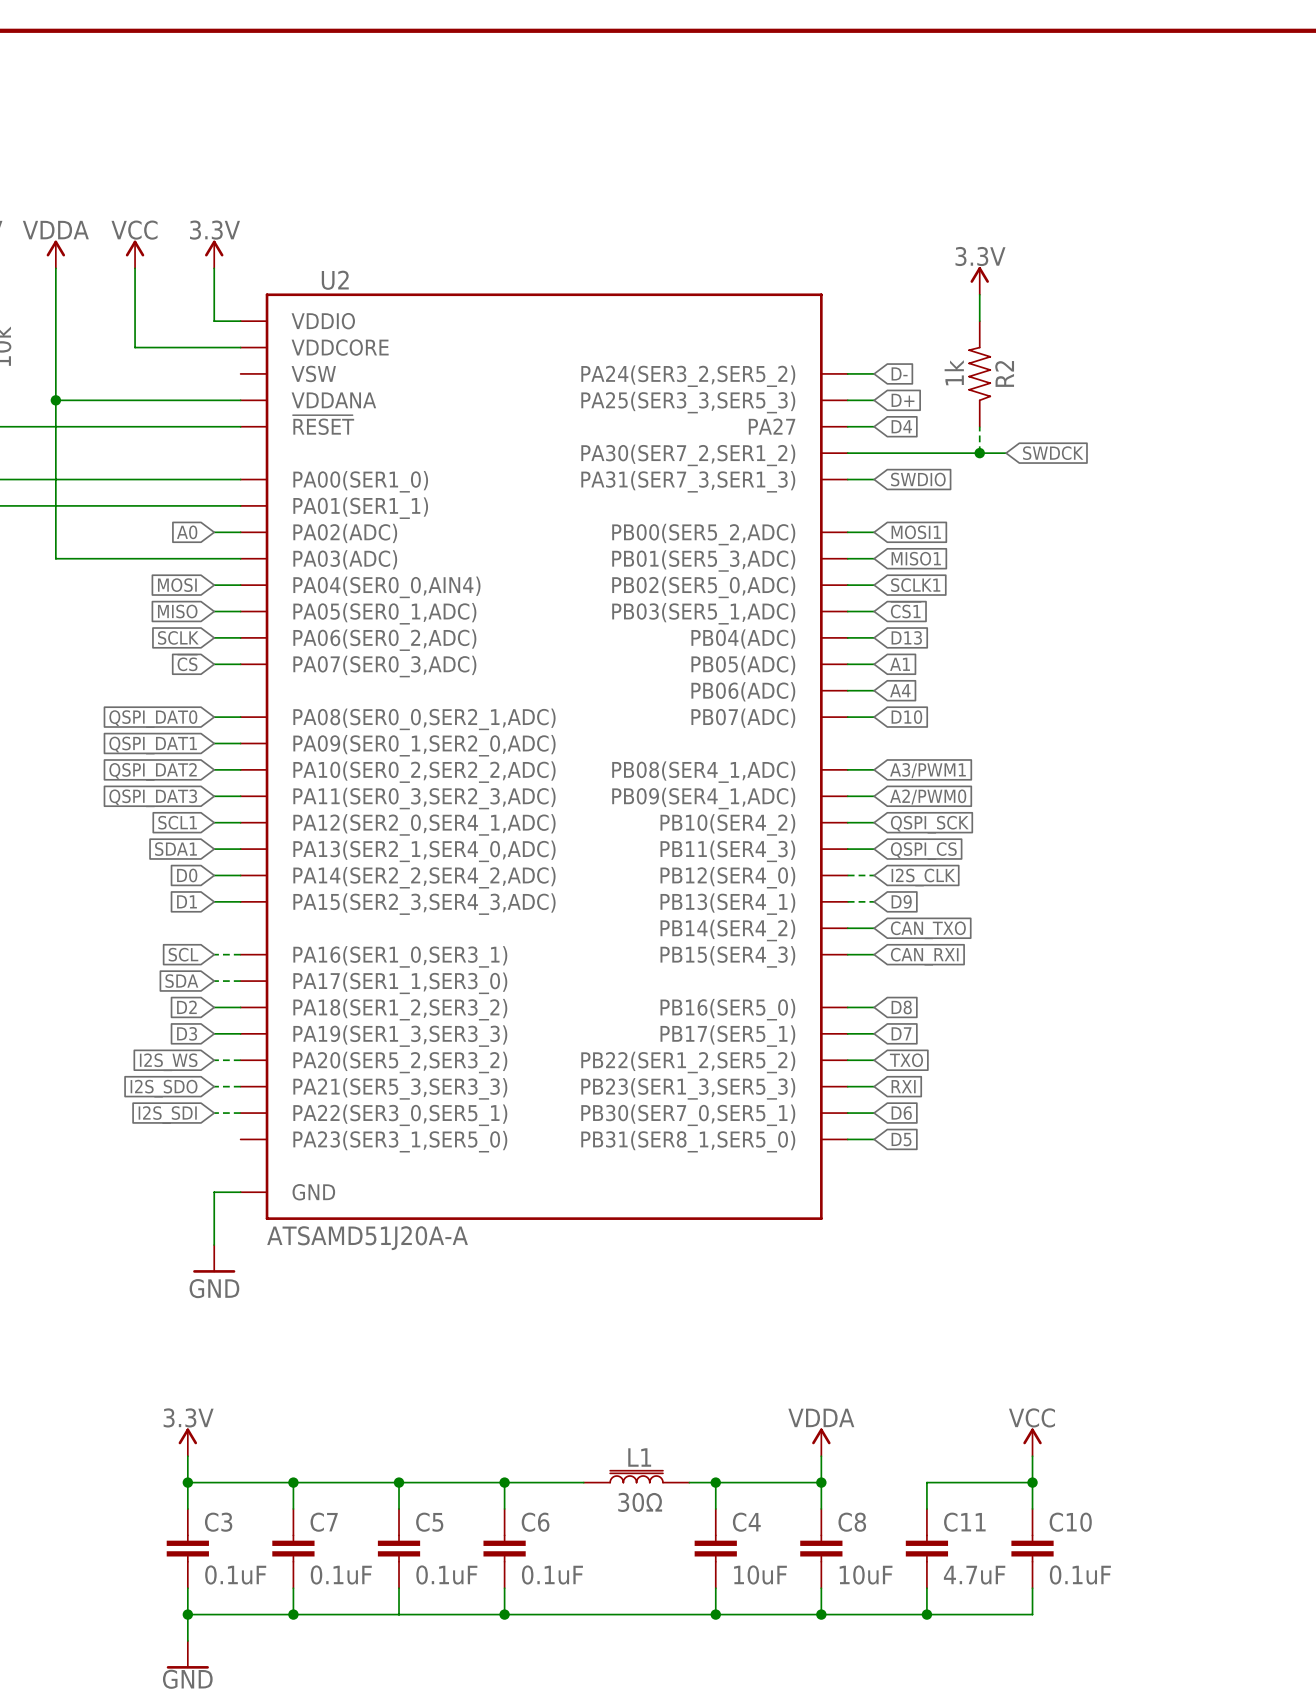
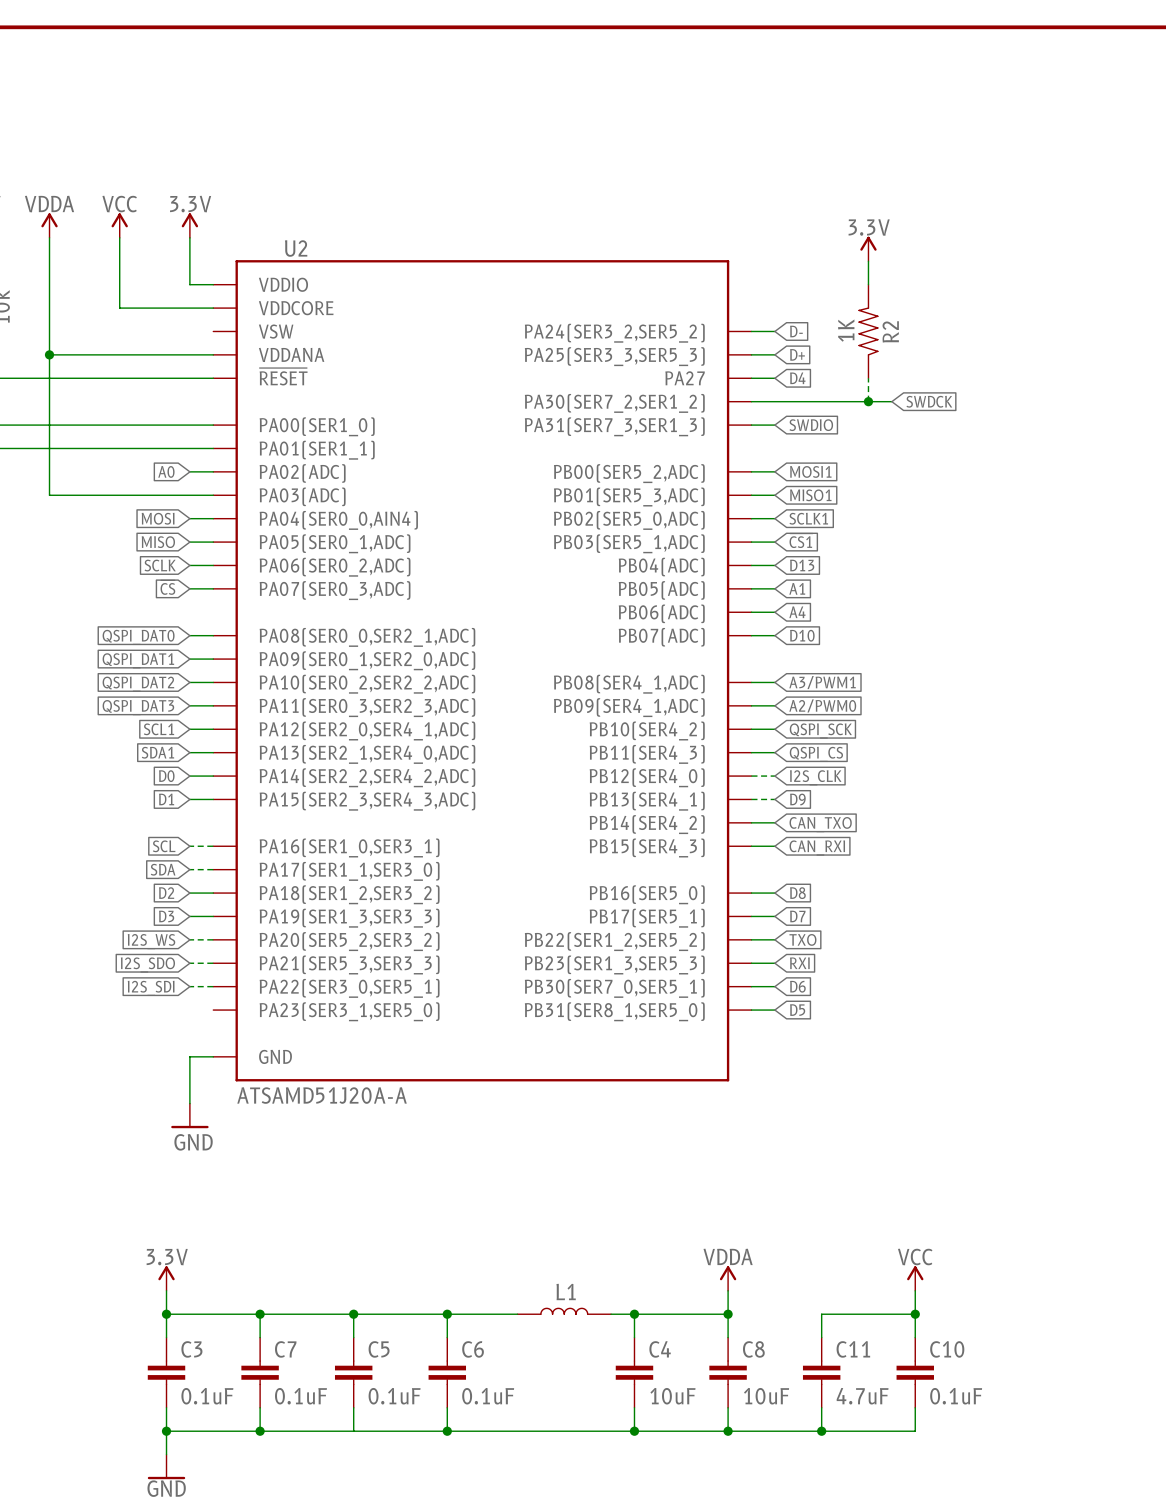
R2 value: 1k (954, 372) -> 1K (846, 330)
L1 symbol: [583, 1469, 690, 1484] -> [517, 1307, 612, 1315]
L1 value: 30Ω (640, 1502) -> none

